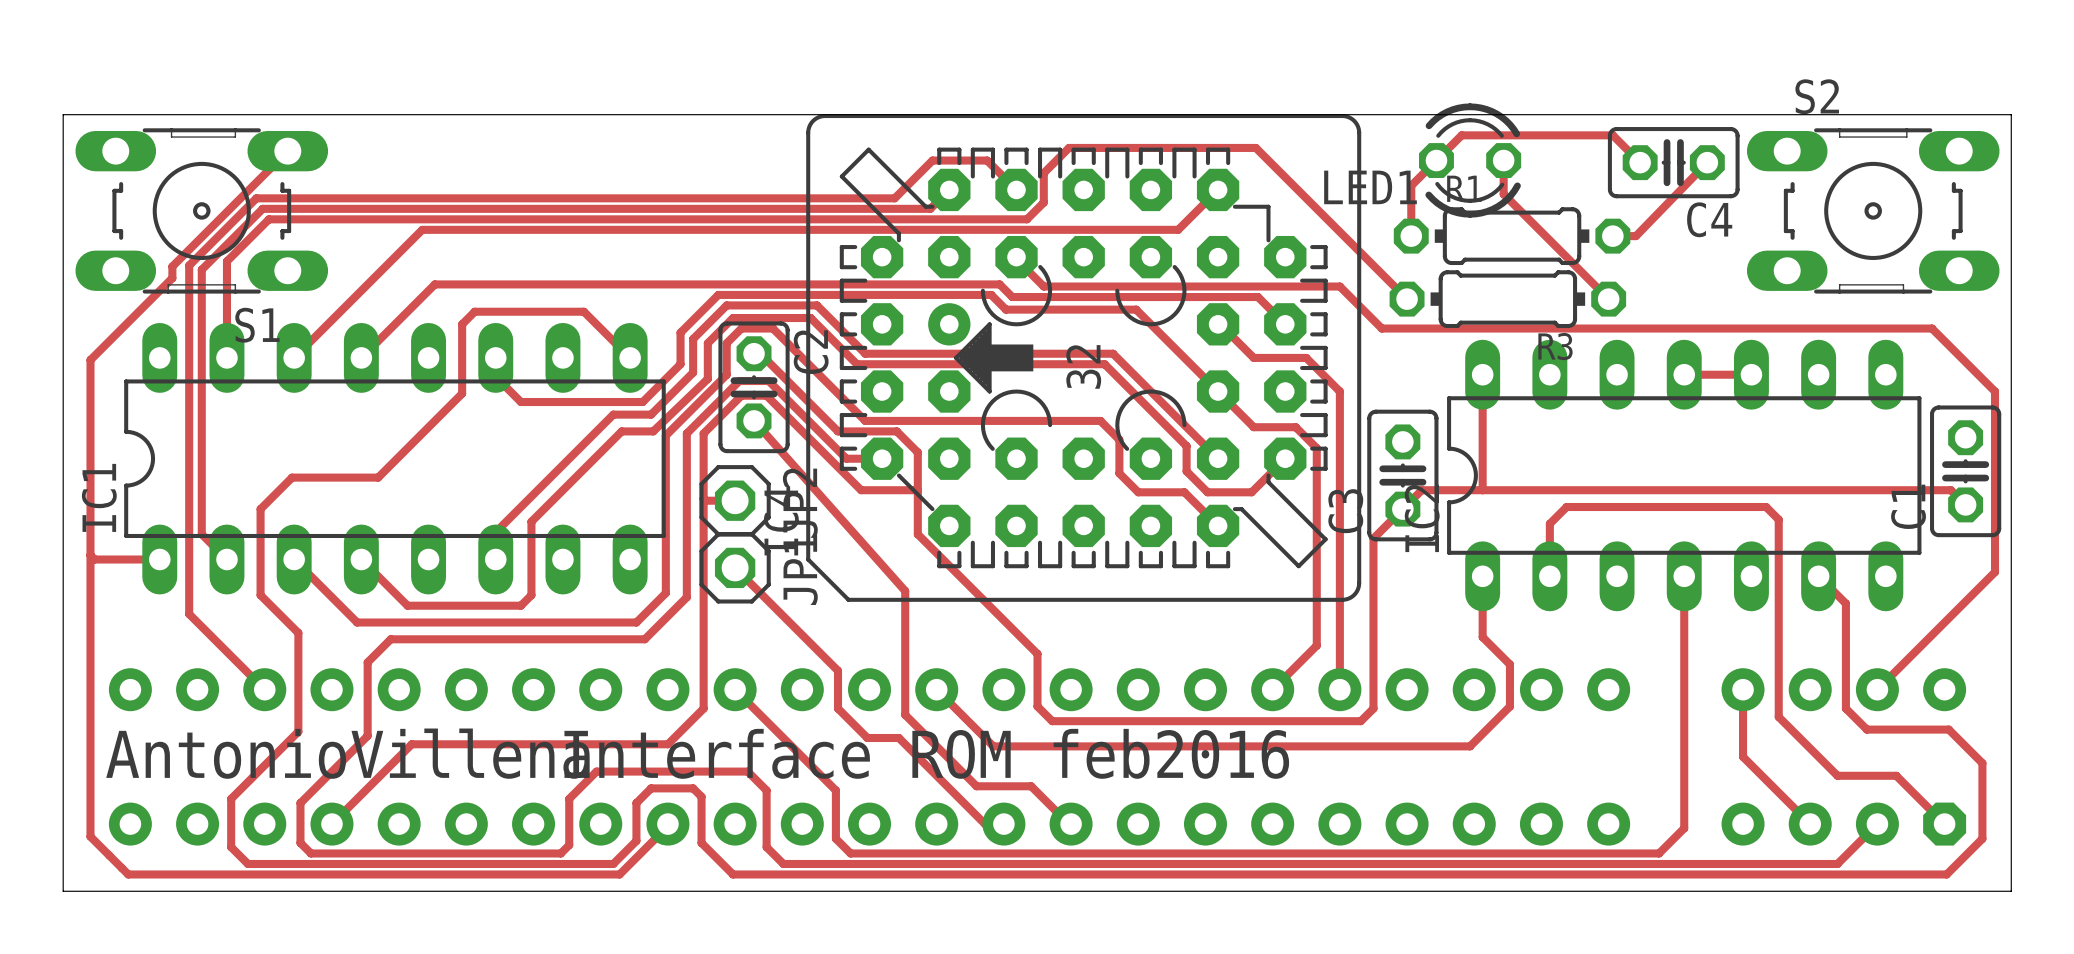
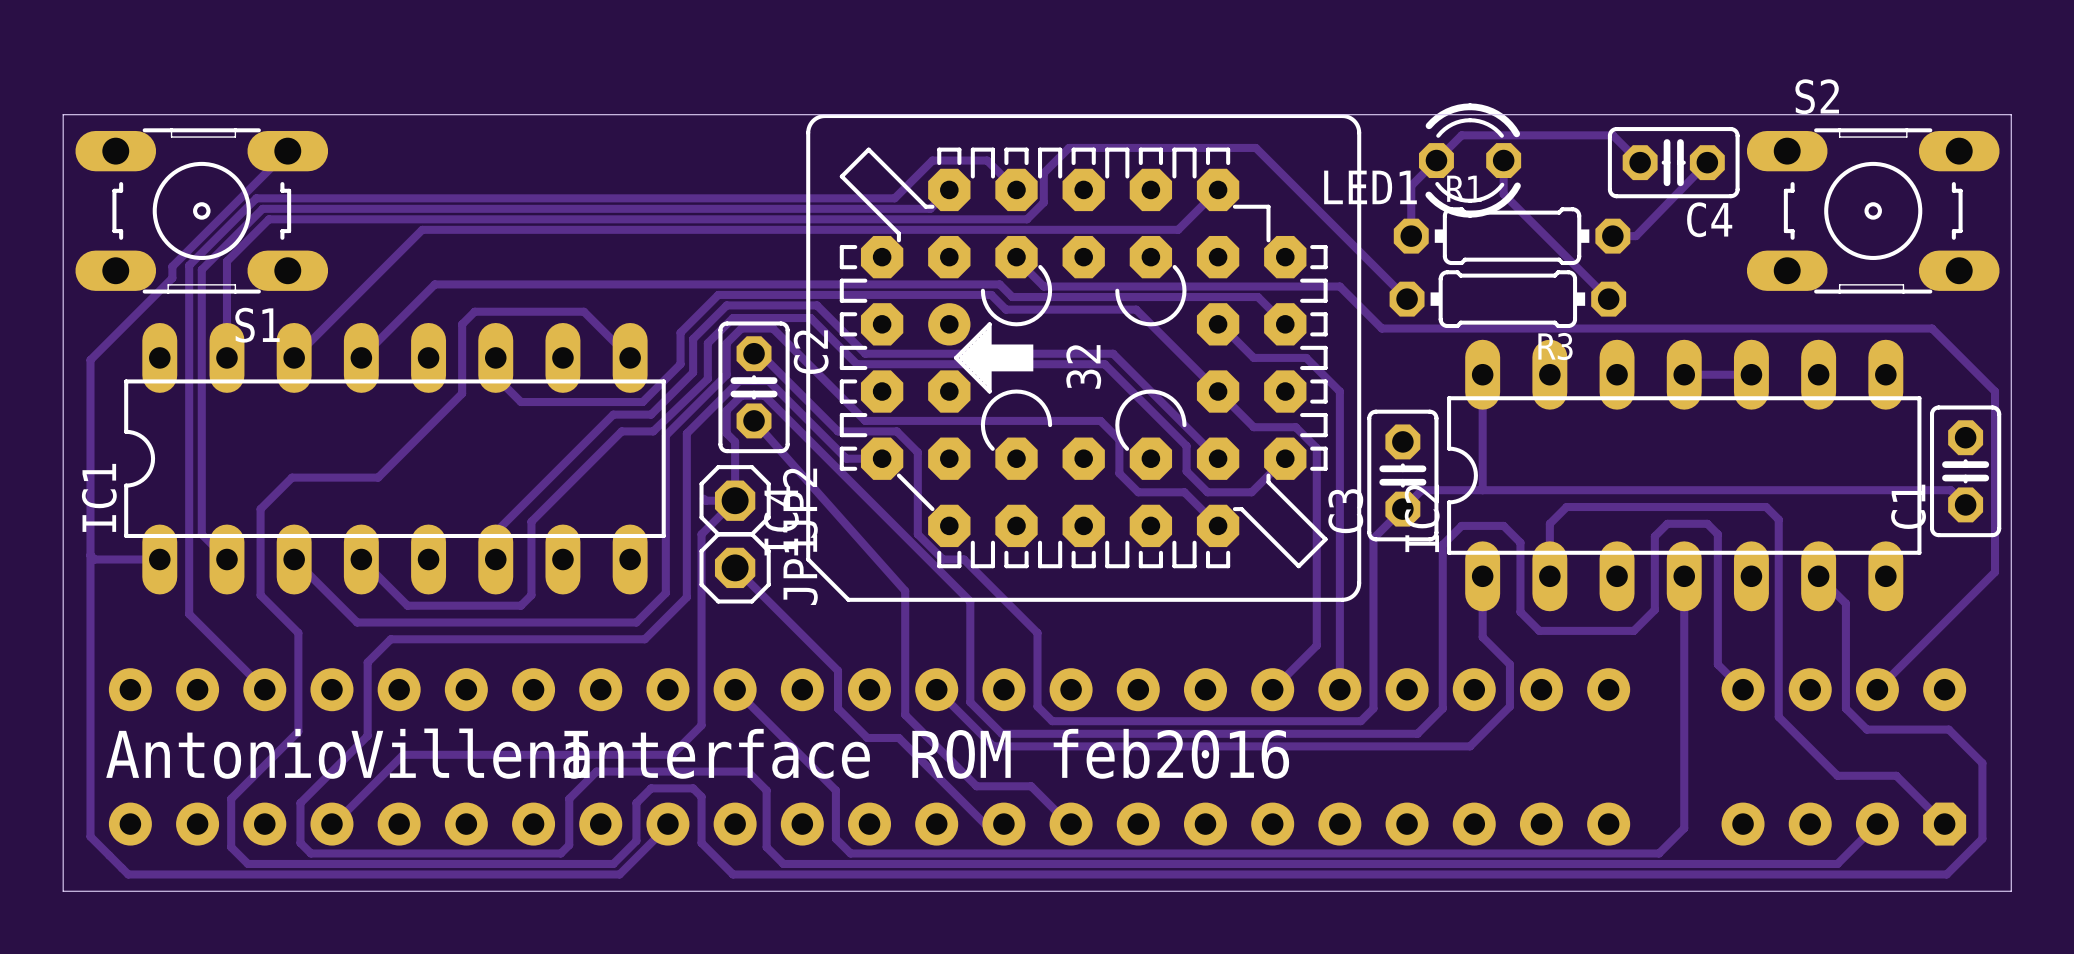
track: (764, 395) (861, 490) (917, 490) -> (764, 395) (970, 601) (970, 702) (1001, 733) (1417, 733) (1442, 708) (1442, 544) (1461, 525) (1503, 525) (1520, 542) (1520, 612) (1539, 630) (1633, 630) (1654, 609) (1654, 536) (1667, 523) (1707, 523) (1717, 534) (1717, 664) (1743, 689)
track: (726, 410) (703, 433) (703, 708) (667, 744) (411, 744) (331, 824) -> (726, 410) (726, 433) (735, 441) (735, 500) (701, 534) (701, 725) (672, 754) (403, 754) (331, 824)
track: (943, 559) (1037, 654) -> (943, 559) (964, 559) (1037, 633) (1037, 654)
track: (1743, 689) (1743, 756) (1810, 824) -> none

